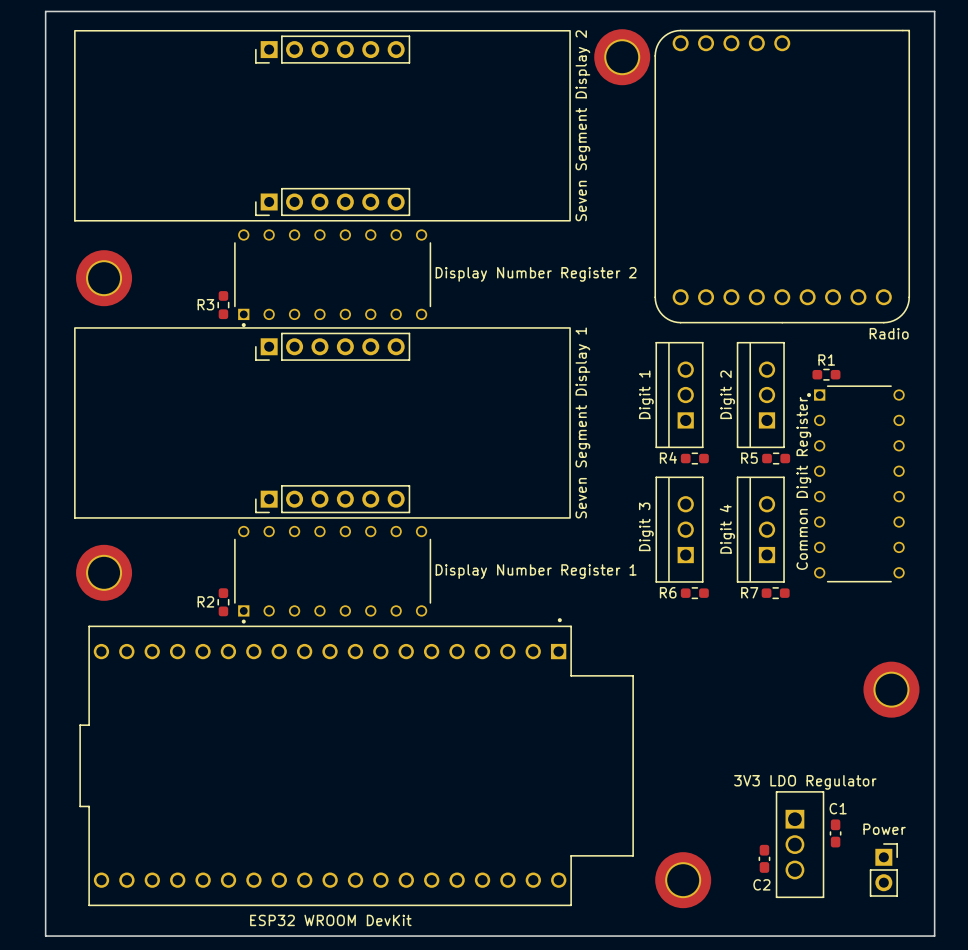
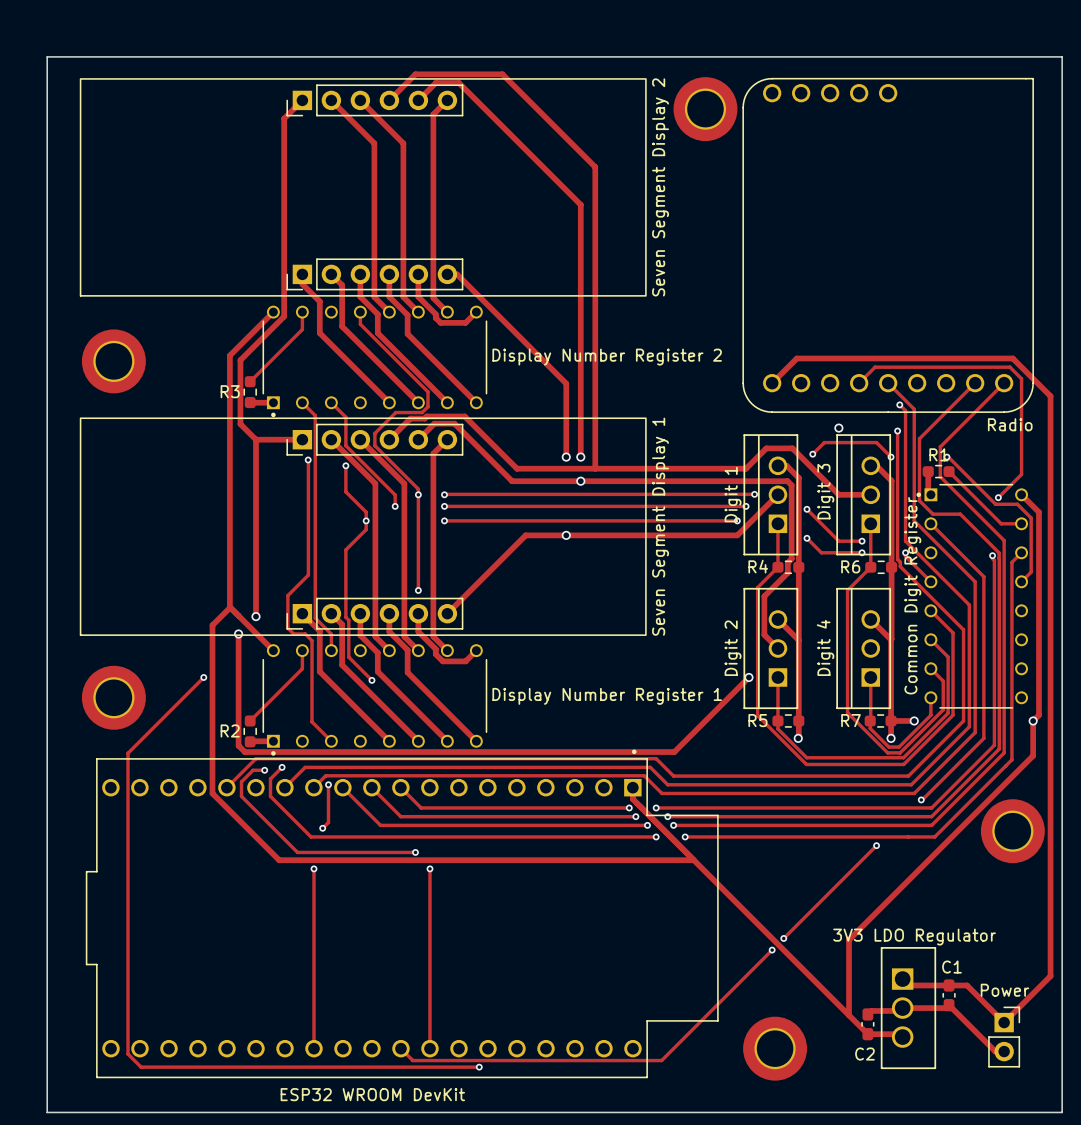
track: none -> (302, 100) (284, 118) (284, 316) (240, 360) (240, 424) (255, 439)
track: none -> (331, 100) (374, 143) (374, 297) (389, 312)
track: none -> (360, 100) (403, 143) (403, 297) (418, 312)
track: none -> (389, 100) (415, 74) (502, 74) (595, 167) (595, 468)
track: none -> (418, 100) (435, 83) (458, 83) (580, 204) (580, 457)
track: none -> (447, 100) (433, 114) (433, 298) (447, 312)
track: none -> (302, 274) (302, 284) (319, 301) (319, 333) (389, 402)
track: none -> (331, 274) (342, 285) (342, 326) (418, 402)
track: none -> (360, 274) (360, 296) (377, 314) (377, 333) (447, 402)
track: none -> (389, 274) (389, 296) (407, 315) (407, 334) (476, 402)
track: none -> (418, 274) (418, 296) (435, 314) (435, 317) (440, 322) (465, 322) (476, 312)
track: none -> (447, 274) (457, 274) (566, 383) (566, 457)
track: none -> (273, 312) (229, 355) (229, 607) (273, 650)
track: none -> (302, 312) (302, 329) (250, 381)
track: none -> (360, 312) (360, 324) (428, 391) (428, 406) (422, 412) (395, 412) (374, 433) (374, 445) (418, 489) (418, 590)
Display Number Register 2 name: Display Number Register 2 (536, 274) -> none
text: none -> Display Number Register 2 (607, 357)
track: none -> (772, 383) (796, 358) (1012, 358) (1050, 396) (1050, 976) (1004, 1022) (967, 985) (909, 985) (902, 979)
track: none -> (859, 383) (875, 367) (1009, 367) (1021, 378) (1021, 474) (998, 497)
track: none -> (888, 383) (914, 409) (914, 520) (975, 581) (975, 732) (914, 793) (661, 793) (644, 775) (325, 775) (313, 787)
track: none -> (975, 383) (919, 438) (919, 500) (932, 514) (960, 514) (999, 552) (999, 558)
track: none -> (1004, 383) (940, 446) (940, 476) (1004, 540) (1004, 752) (931, 825) (673, 825)
track: none -> (250, 402) (273, 402)
track: none -> (302, 402) (315, 415) (315, 618) (331, 634) (331, 650)
track: none -> (331, 402) (345, 417) (345, 445) (395, 494) (395, 506)
track: none -> (899, 404) (905, 410) (905, 541) (969, 604) (969, 726) (911, 784) (667, 784) (650, 767) (305, 767) (284, 787)
via: none -> (899, 404)
Radio name: Radio (889, 333) -> none
text: none -> Radio (1010, 424)
via: none -> (838, 428)
track: none -> (897, 431) (897, 559) (900, 562) (900, 566) (963, 629) (963, 720) (908, 776) (673, 776) (656, 758) (255, 758) (226, 787)
via: none -> (897, 431)
track: none -> (255, 439) (255, 616)
track: none -> (255, 439) (302, 439)
track: none -> (331, 439) (375, 483) (375, 636) (389, 650)
track: none -> (360, 439) (404, 483) (404, 636) (418, 650)
track: none -> (389, 439) (410, 418) (464, 416) (516, 468) (746, 468) (766, 448) (792, 448) (838, 494) (870, 494)
track: none -> (418, 439) (434, 423) (454, 423) (512, 481) (787, 481) (791, 485) (791, 558) (787, 562) (787, 572) (764, 596) (764, 634) (777, 648)
track: none -> (447, 439) (433, 453) (433, 636) (447, 650)
track: none -> (812, 454) (824, 442) (876, 442) (891, 457)
via: none -> (812, 454)
via: none -> (566, 457)
via: none -> (580, 457)
via: none -> (891, 457)
track: none -> (946, 457) (995, 504) (1017, 504) (1031, 518) (1031, 572) (1021, 581)
via: none -> (946, 457)
track: none -> (308, 459) (308, 575) (287, 595) (287, 628) (293, 633) (305, 633) (312, 640) (312, 721) (331, 741)
via: none -> (308, 459)
track: none -> (345, 465) (345, 491) (366, 512) (366, 529) (345, 549) (345, 617) (348, 620) (348, 657) (371, 680)
via: none -> (345, 465)
track: none -> (777, 465) (786, 465) (798, 477) (798, 738)
track: none -> (870, 465) (876, 465) (891, 480) (891, 639)
track: none -> (928, 471) (928, 492) (930, 494)
track: none -> (949, 471) (1001, 523) (1021, 523)
via: none -> (580, 481)
text: none -> Digit 3 (825, 491)
Digit 1 name: Digit 1 (646, 394) -> none
text: none -> Digit 1 (733, 494)
track: none -> (754, 494) (444, 494)
via: none -> (754, 494)
Digit 2 name: Digit 2 (727, 394) -> none
via: none -> (418, 494)
via: none -> (444, 494)
track: none -> (777, 494) (737, 535) (525, 535) (447, 613)
track: none -> (1021, 494) (1038, 512) (1038, 715) (1033, 720) (1033, 755) (849, 939) (849, 1015)
via: none -> (998, 497)
via: none -> (395, 506)
track: none -> (444, 506) (746, 506)
via: none -> (444, 506)
via: none -> (746, 506)
track: none -> (806, 509) (838, 541) (862, 541)
via: none -> (806, 509)
via: none -> (366, 520)
track: none -> (444, 520) (737, 520)
via: none -> (444, 520)
via: none -> (737, 520)
track: none -> (777, 523) (777, 567) (757, 587) (757, 715) (806, 764) (903, 764) (953, 715) (953, 632) (930, 610)
track: none -> (870, 523) (870, 567) (847, 590) (847, 712) (887, 752) (900, 752) (943, 709) (943, 681) (930, 668)
track: none -> (930, 523) (983, 576) (983, 738) (921, 799)
Seven Segment Display 1 name: Seven Segment Display 1 (582, 422) -> none
text: none -> Seven Segment Display 1 (660, 526)
via: none -> (566, 535)
track: none -> (806, 538) (821, 552) (862, 552)
via: none -> (806, 538)
via: none -> (862, 541)
via: none -> (862, 552)
track: none -> (905, 552) (905, 556) (930, 581)
via: none -> (905, 552)
track: none -> (1021, 552) (1011, 562) (1011, 759) (934, 836) (685, 836)
track: none -> (992, 555) (994, 560) (994, 745) (931, 807) (656, 807)
via: none -> (992, 555)
track: none -> (999, 558) (999, 749) (931, 816) (667, 816)
R5 name: R5 (749, 458) -> R6 (850, 566)
via: none -> (418, 590)
Common Digit Register name: Common Digit Register (803, 483) -> none
text: none -> Common Digit Register (912, 595)
track: none -> (230, 607) (212, 625) (212, 793) (279, 860) (693, 860)
track: none -> (302, 613) (319, 631) (319, 671) (389, 741)
track: none -> (331, 613) (342, 624) (342, 665) (418, 741)
track: none -> (360, 613) (360, 635) (377, 652) (377, 671) (447, 741)
track: none -> (389, 613) (389, 631) (407, 650) (407, 672) (476, 741)
track: none -> (418, 613) (418, 631) (435, 649) (435, 654) (442, 661) (465, 661) (476, 650)
via: none -> (255, 616)
track: none -> (777, 619) (798, 640)
track: none -> (870, 619) (891, 639)
track: none -> (238, 633) (238, 745) (244, 752) (674, 752) (748, 677)
via: none -> (238, 633)
track: none -> (891, 639) (891, 738)
track: none -> (930, 639) (948, 657) (948, 713) (903, 757) (806, 757) (777, 729) (777, 677)
Digit 3 name: Digit 3 (646, 526) -> none
text: none -> Digit 2 (733, 648)
track: none -> (302, 650) (302, 668) (250, 720)
track: none -> (203, 677) (127, 753) (127, 1054) (141, 1067) (479, 1067)
via: none -> (203, 677)
via: none -> (748, 677)
track: none -> (870, 677) (870, 728) (888, 747) (899, 747) (930, 715) (930, 697)
via: none -> (371, 680)
Display Number Register 1 name: Display Number Register 1 (536, 571) -> none
text: none -> Display Number Register 1 (607, 696)
R6 name: R6 (668, 592) -> R5 (757, 720)
track: none -> (891, 720) (914, 720)
via: none -> (914, 720)
via: none -> (1033, 720)
via: none -> (798, 738)
via: none -> (891, 738)
track: none -> (273, 741) (250, 741)
track: none -> (282, 767) (270, 778) (270, 796) (311, 836) (656, 836)
via: none -> (282, 767)
track: none -> (264, 770) (253, 770) (241, 781) (241, 796) (297, 852) (415, 852)
via: none -> (264, 770)
track: none -> (328, 784) (328, 822) (322, 828)
via: none -> (328, 784)
track: none -> (342, 787) (380, 825) (647, 825)
track: none -> (371, 787) (400, 816) (635, 816)
track: none -> (400, 787) (421, 807) (629, 807)
track: none -> (632, 787) (632, 799) (867, 1034) (899, 1034) (902, 1037)
via: none -> (921, 799)
via: none -> (629, 807)
via: none -> (656, 807)
via: none -> (635, 816)
via: none -> (667, 816)
via: none -> (647, 825)
via: none -> (673, 825)
via: none -> (322, 828)
via: none -> (656, 836)
via: none -> (685, 836)
track: none -> (876, 845) (783, 938)
via: none -> (876, 845)
via: none -> (415, 852)
track: none -> (313, 868) (313, 1048)
via: none -> (313, 868)
track: none -> (429, 868) (429, 1048)
via: none -> (429, 868)
3V3 LDO Regulator name: 3V3 LDO Regulator (805, 782) -> none
text: none -> 3V3 LDO Regulator (914, 937)
via: none -> (783, 938)
track: none -> (772, 950) (661, 1060) (412, 1060) (400, 1048)
via: none -> (772, 950)
text: none -> Power (1004, 990)
Power name: Power (884, 829) -> none
track: none -> (867, 1014) (871, 1010) (899, 1010) (902, 1008) (946, 1008) (949, 1005) (995, 1051) (1004, 1051)
via: none -> (479, 1067)

